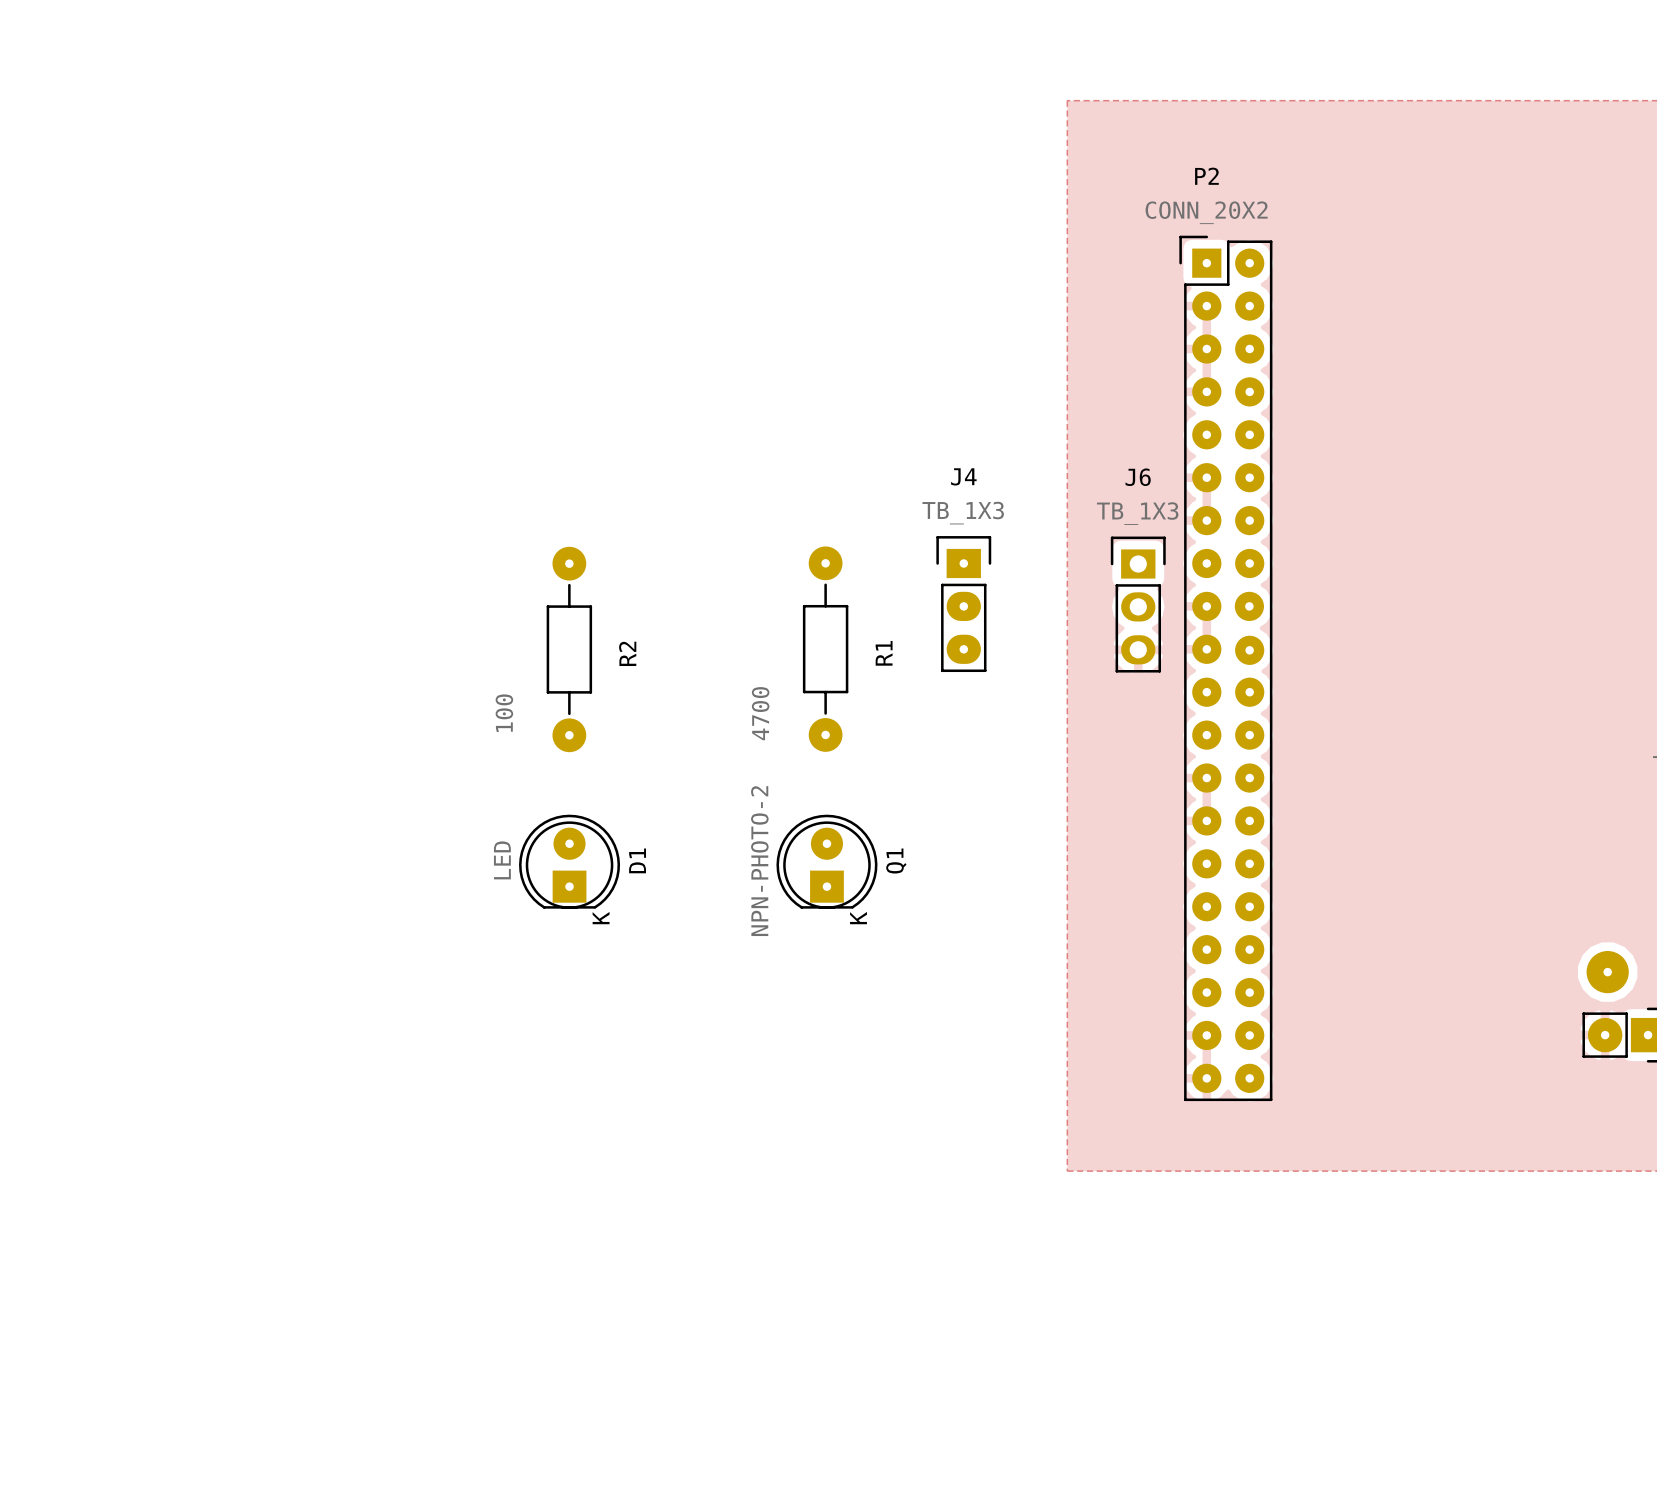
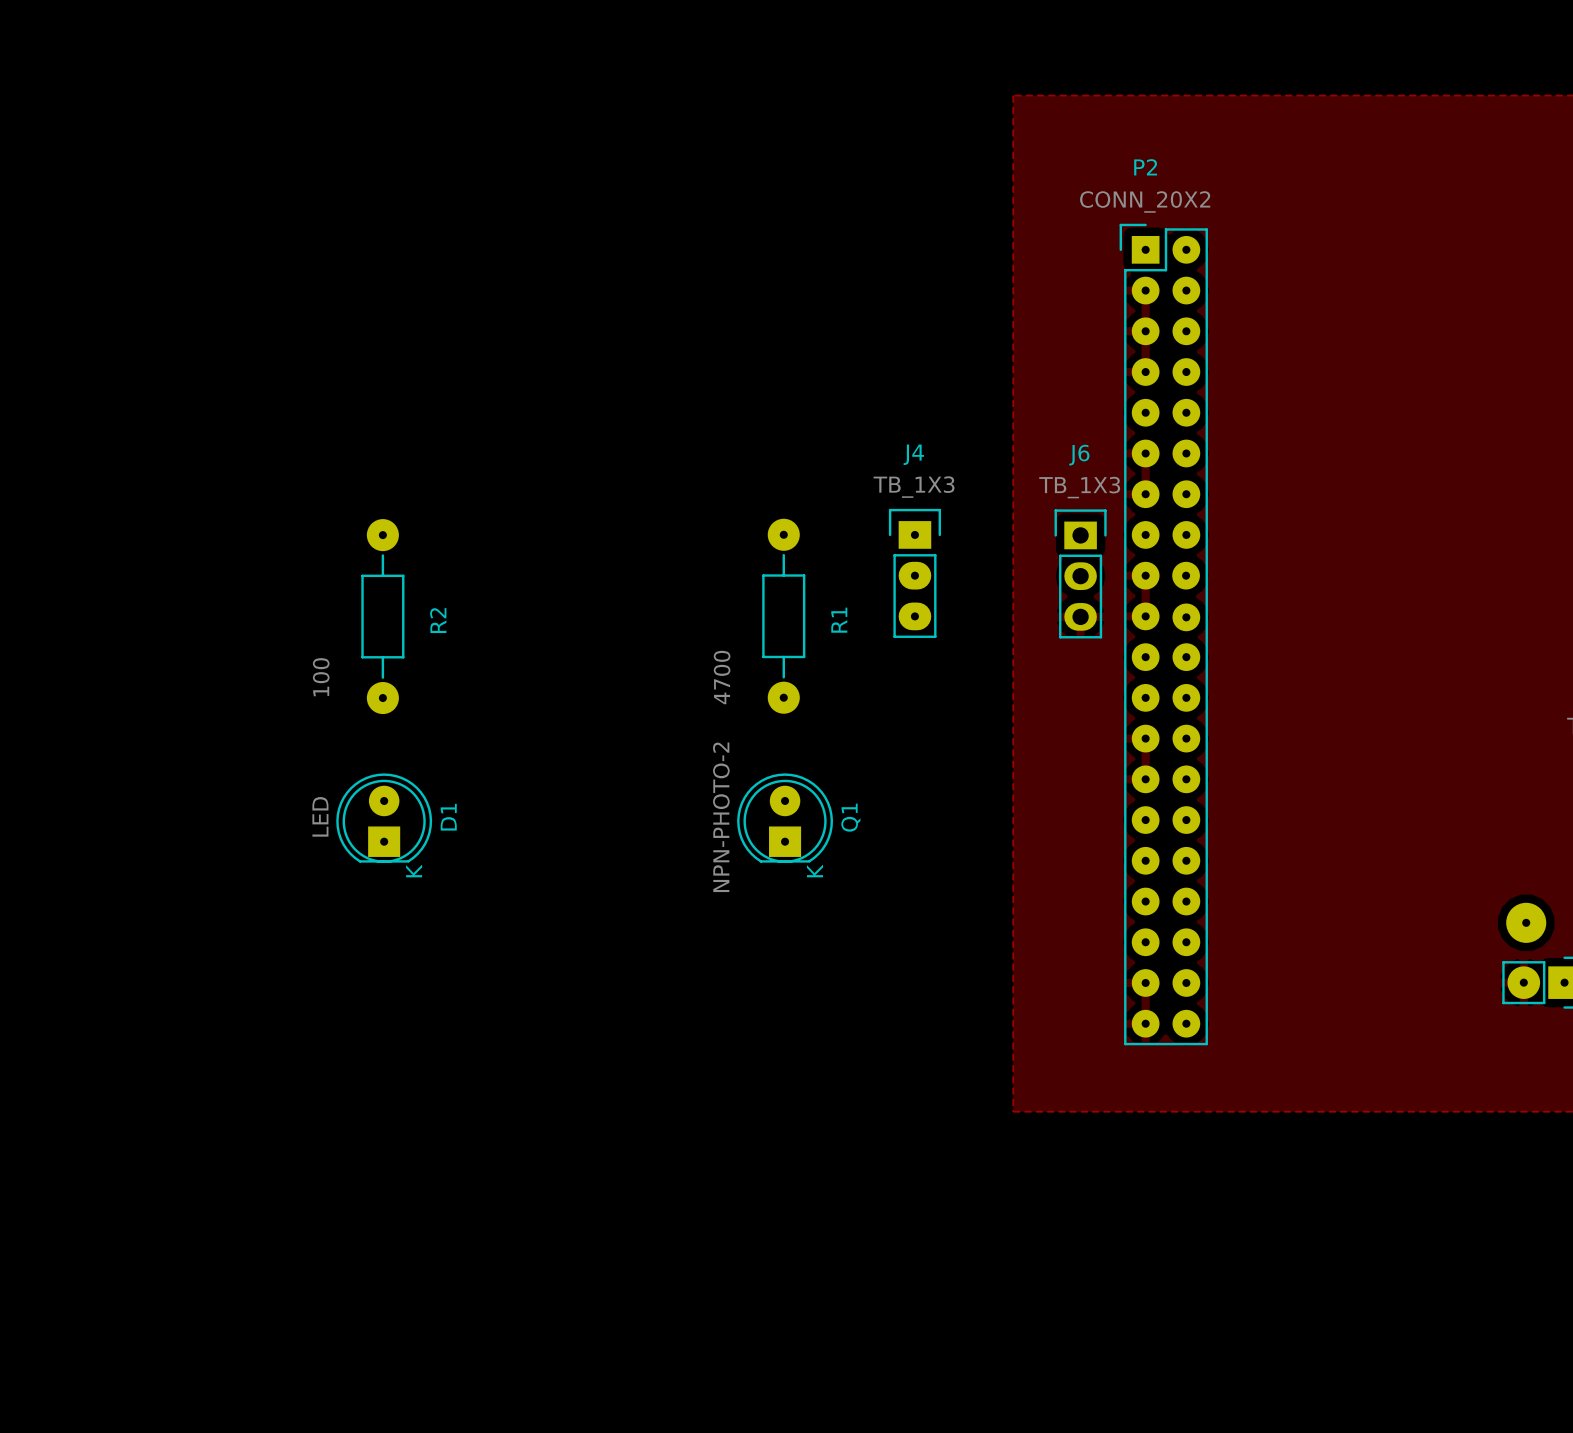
R2 position: (569, 649) -> (382, 616)
D1 position: (569, 861) -> (384, 818)

